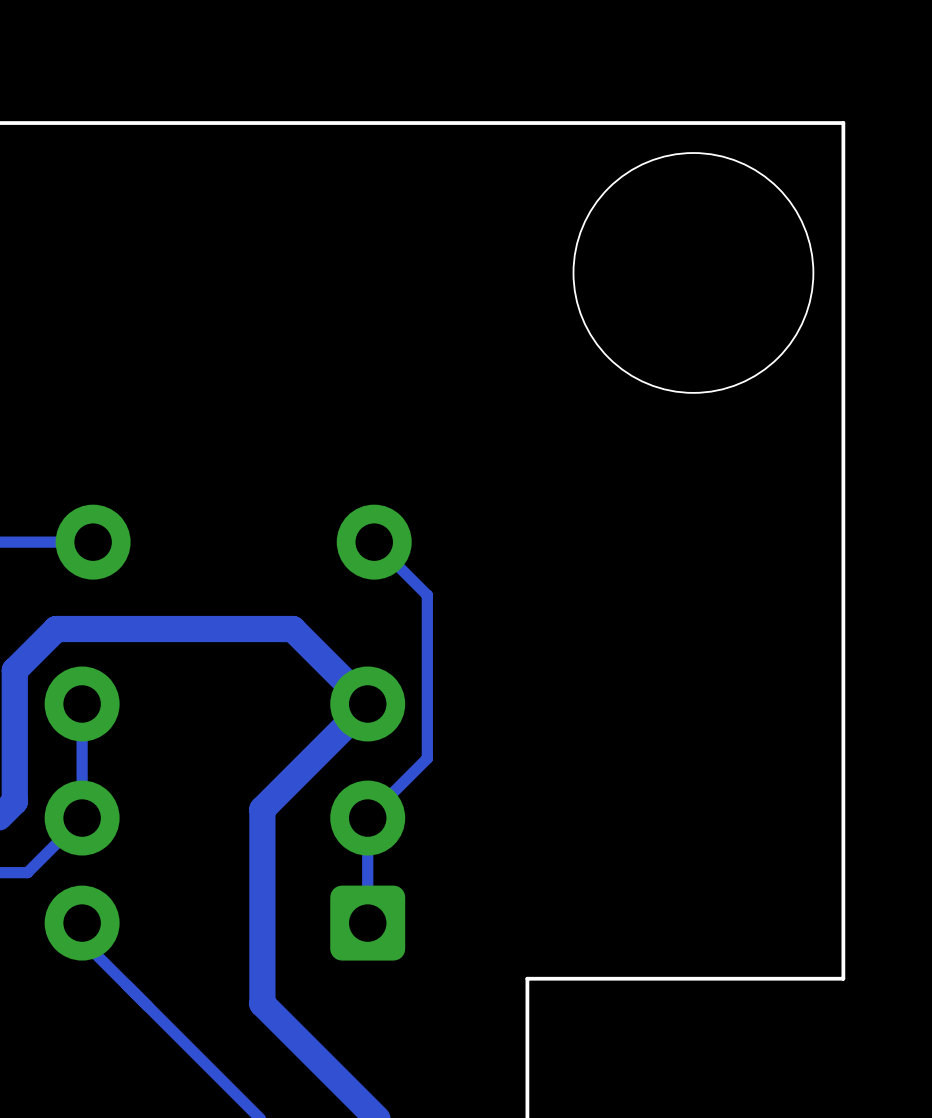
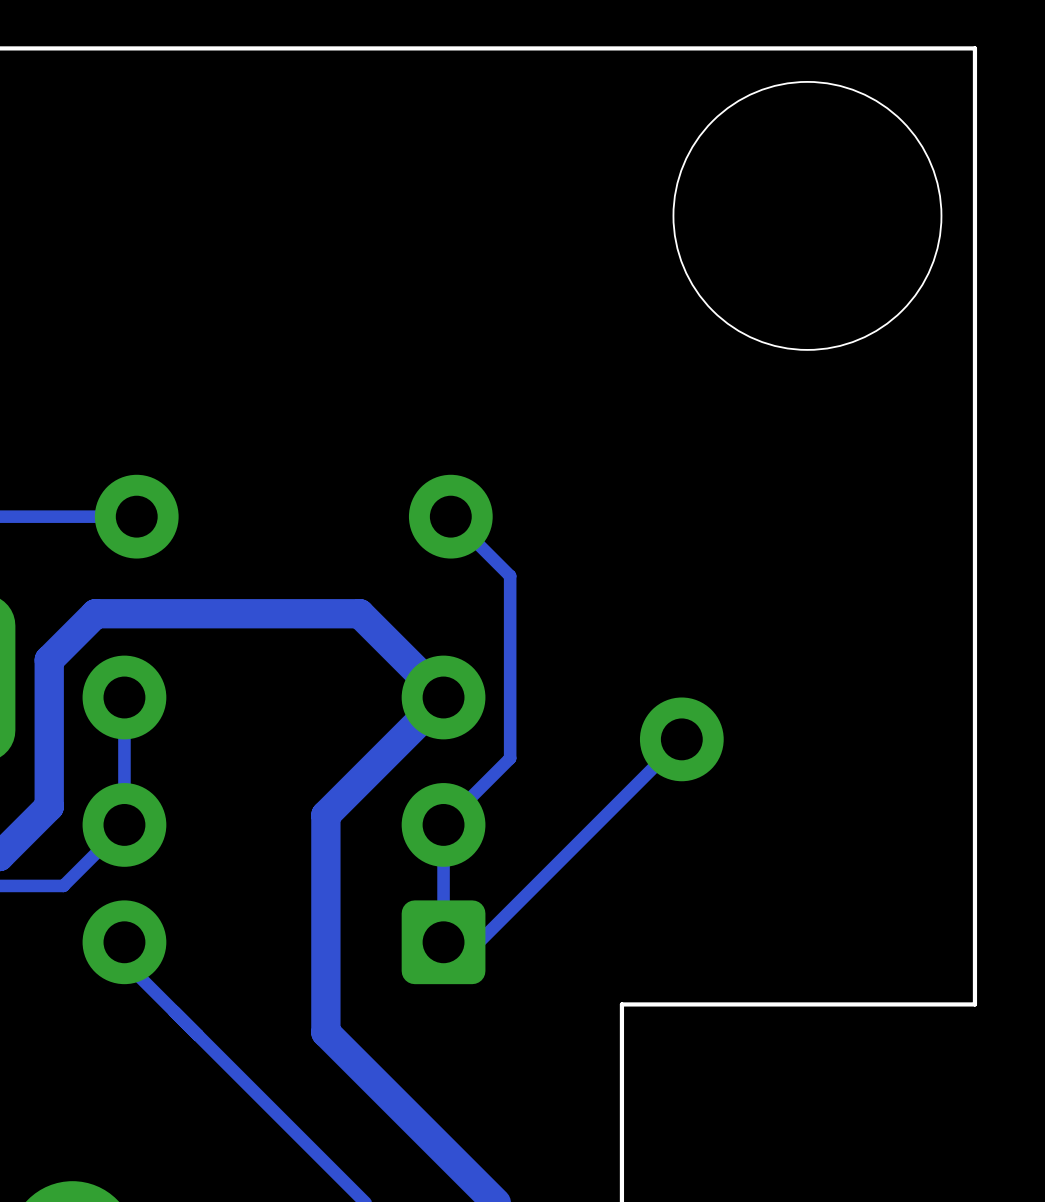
bottom track: none -> (681, 739) (478, 942) (443, 942)
part: none -> (681, 739)

